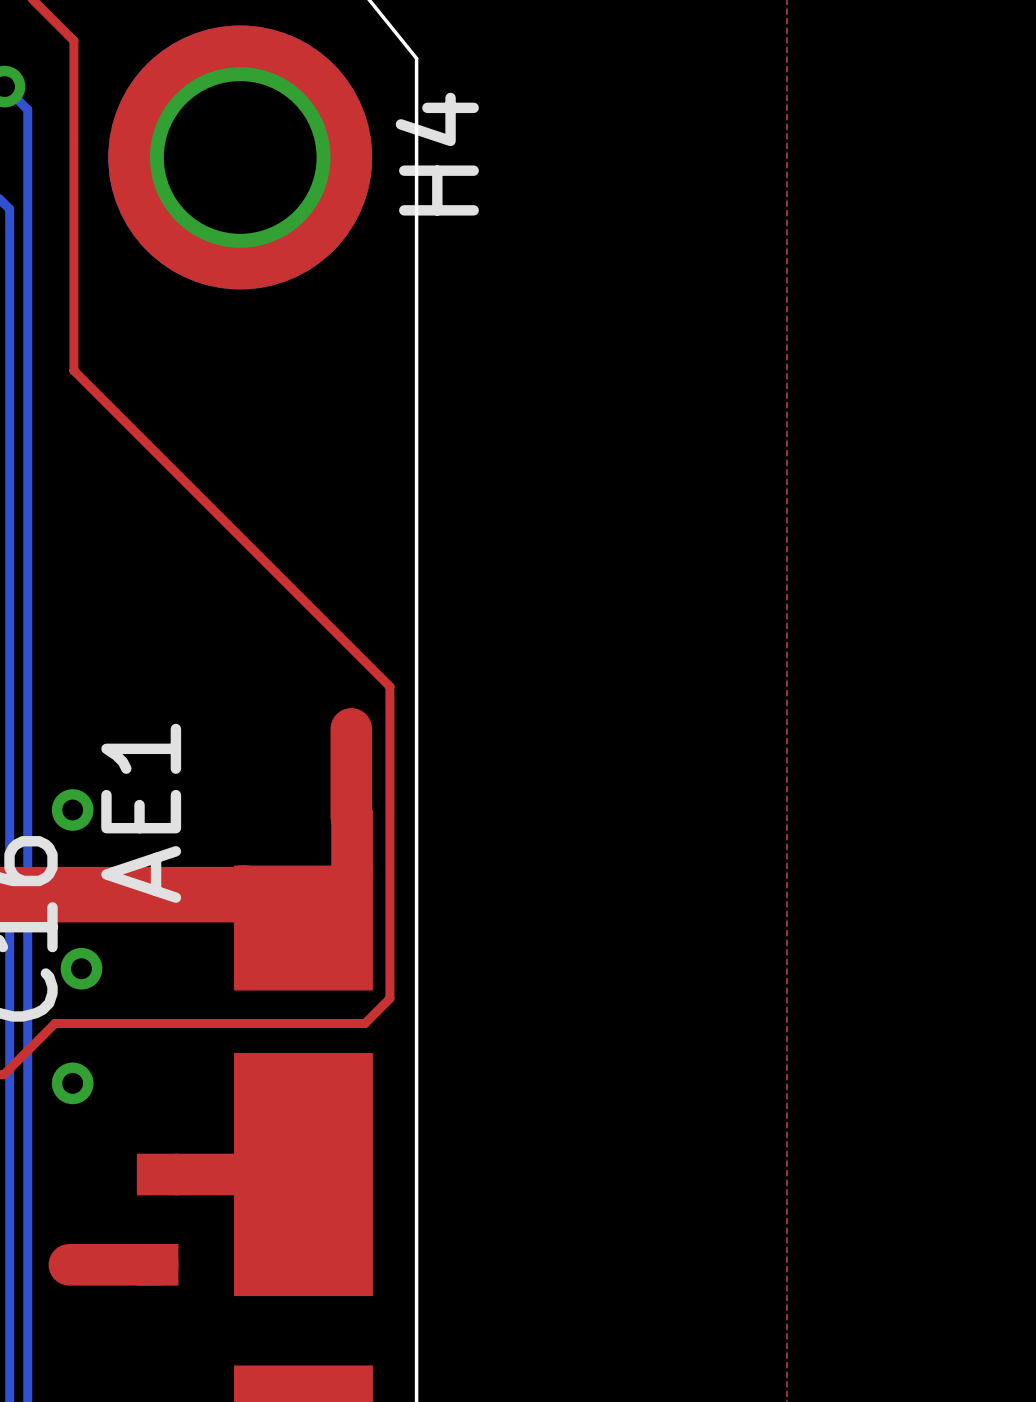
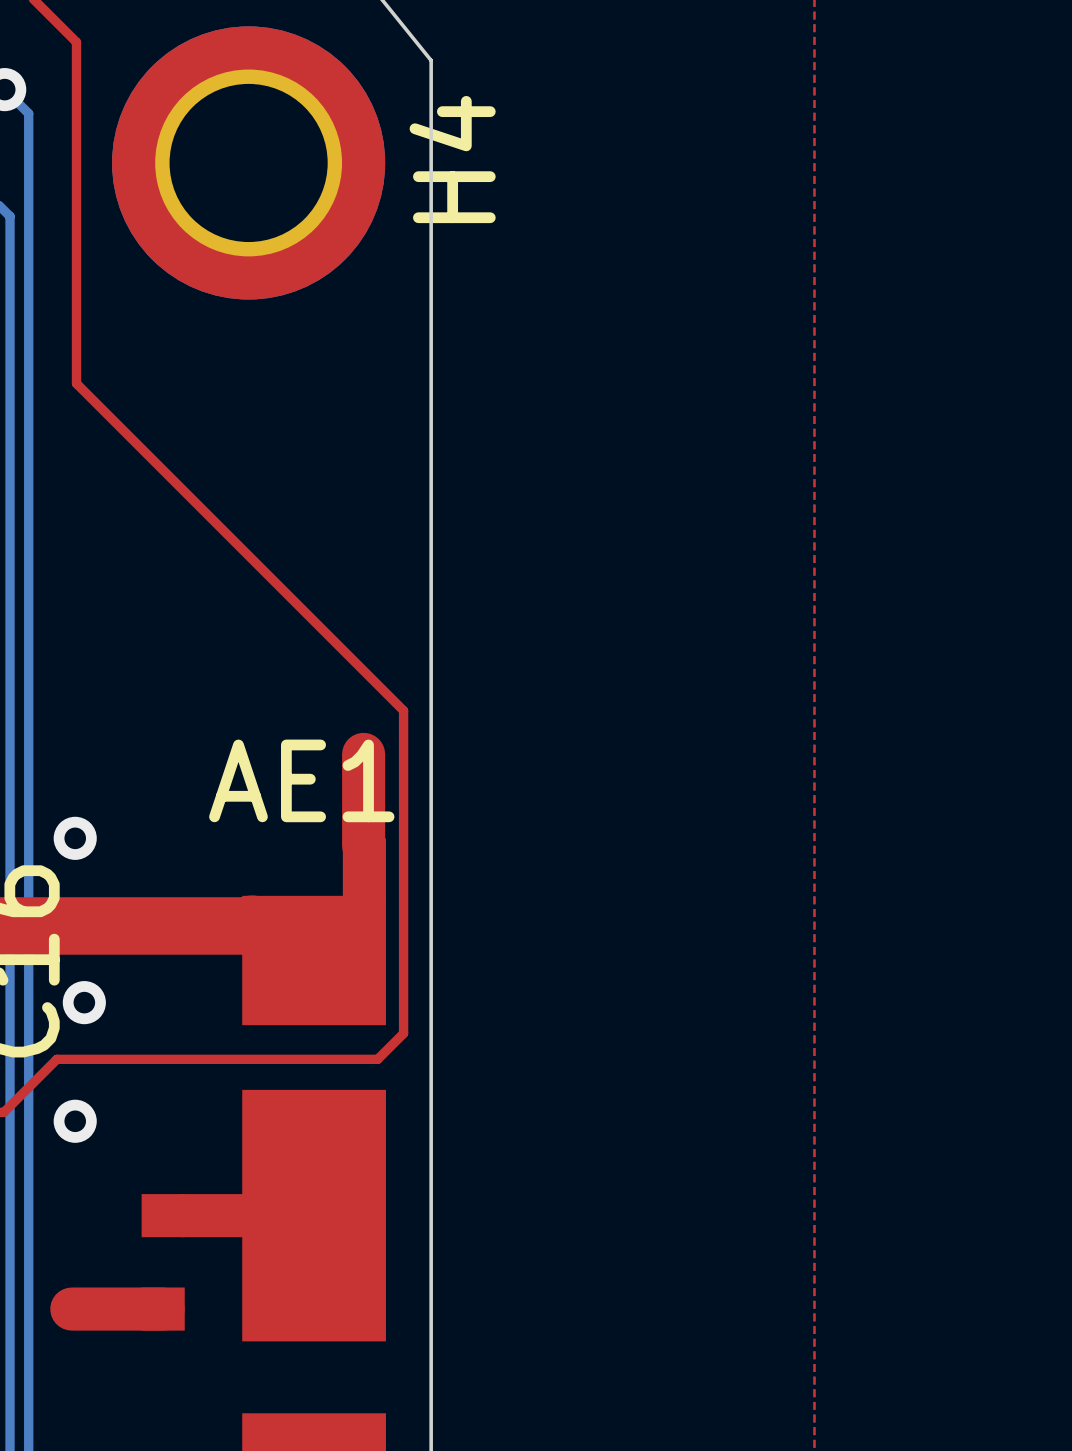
AE1 name rotation: 0° (141, 813) -> 90° clockwise (301, 780)

